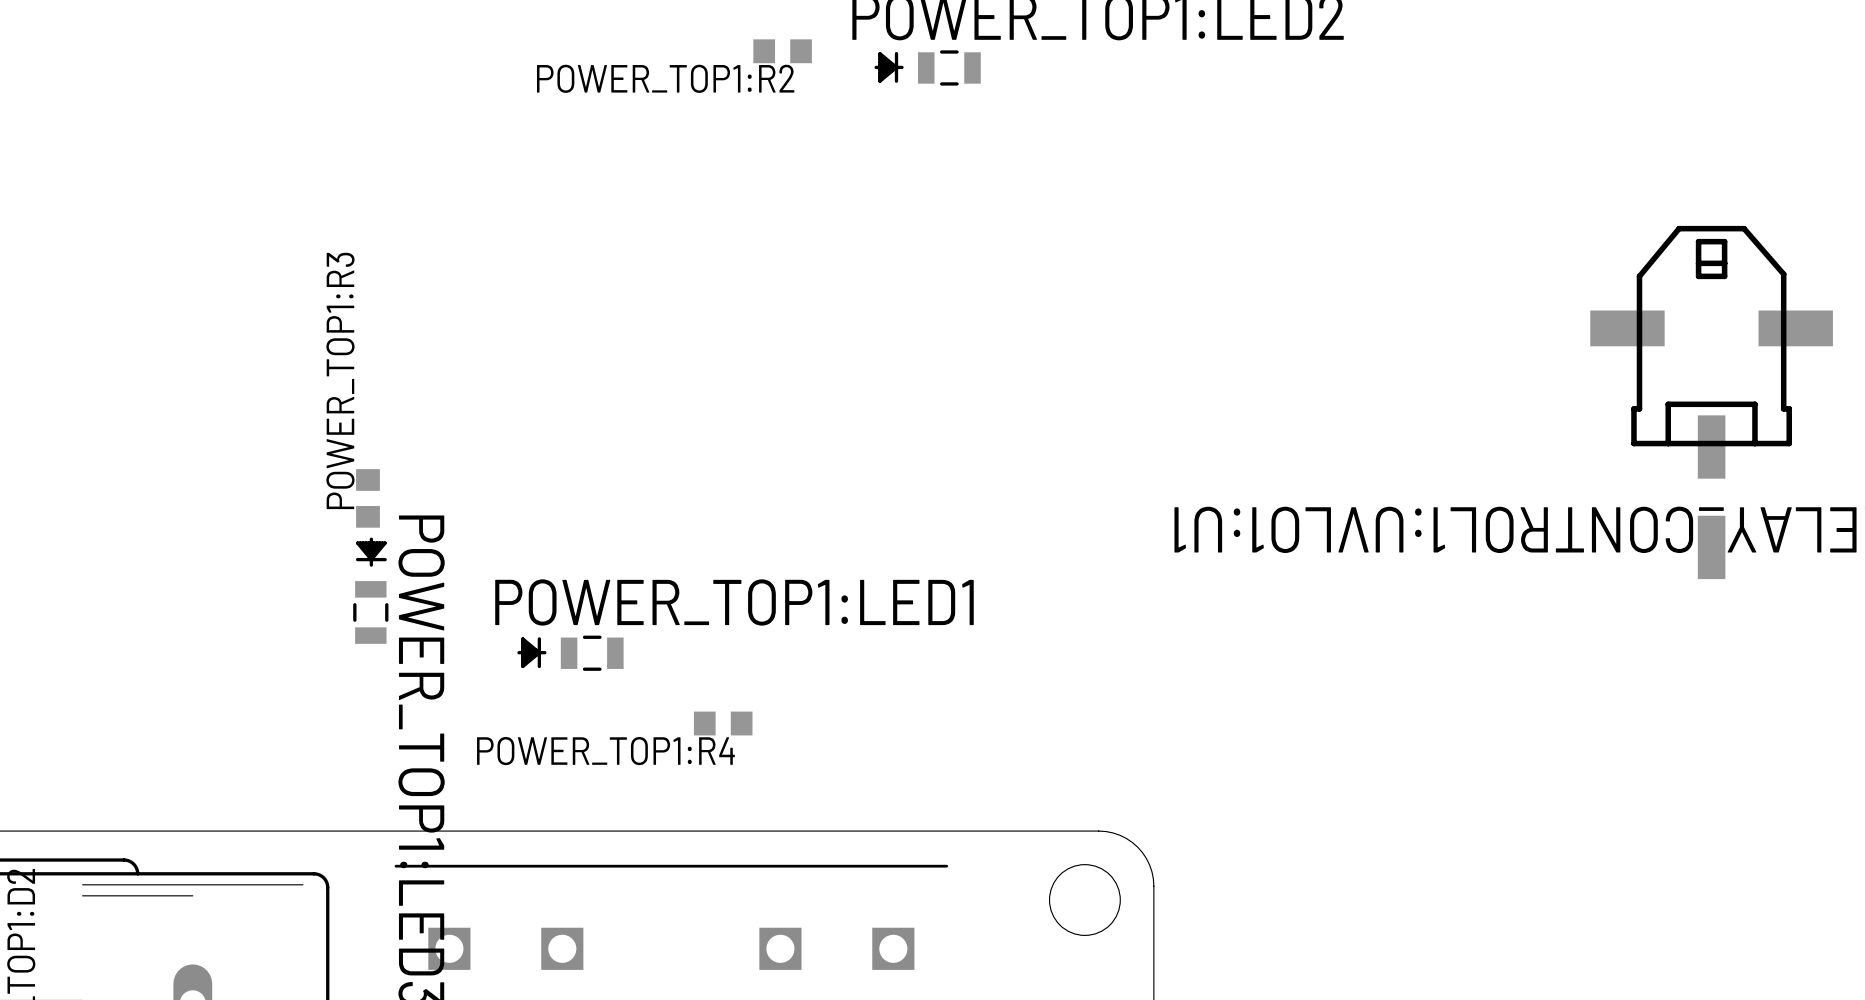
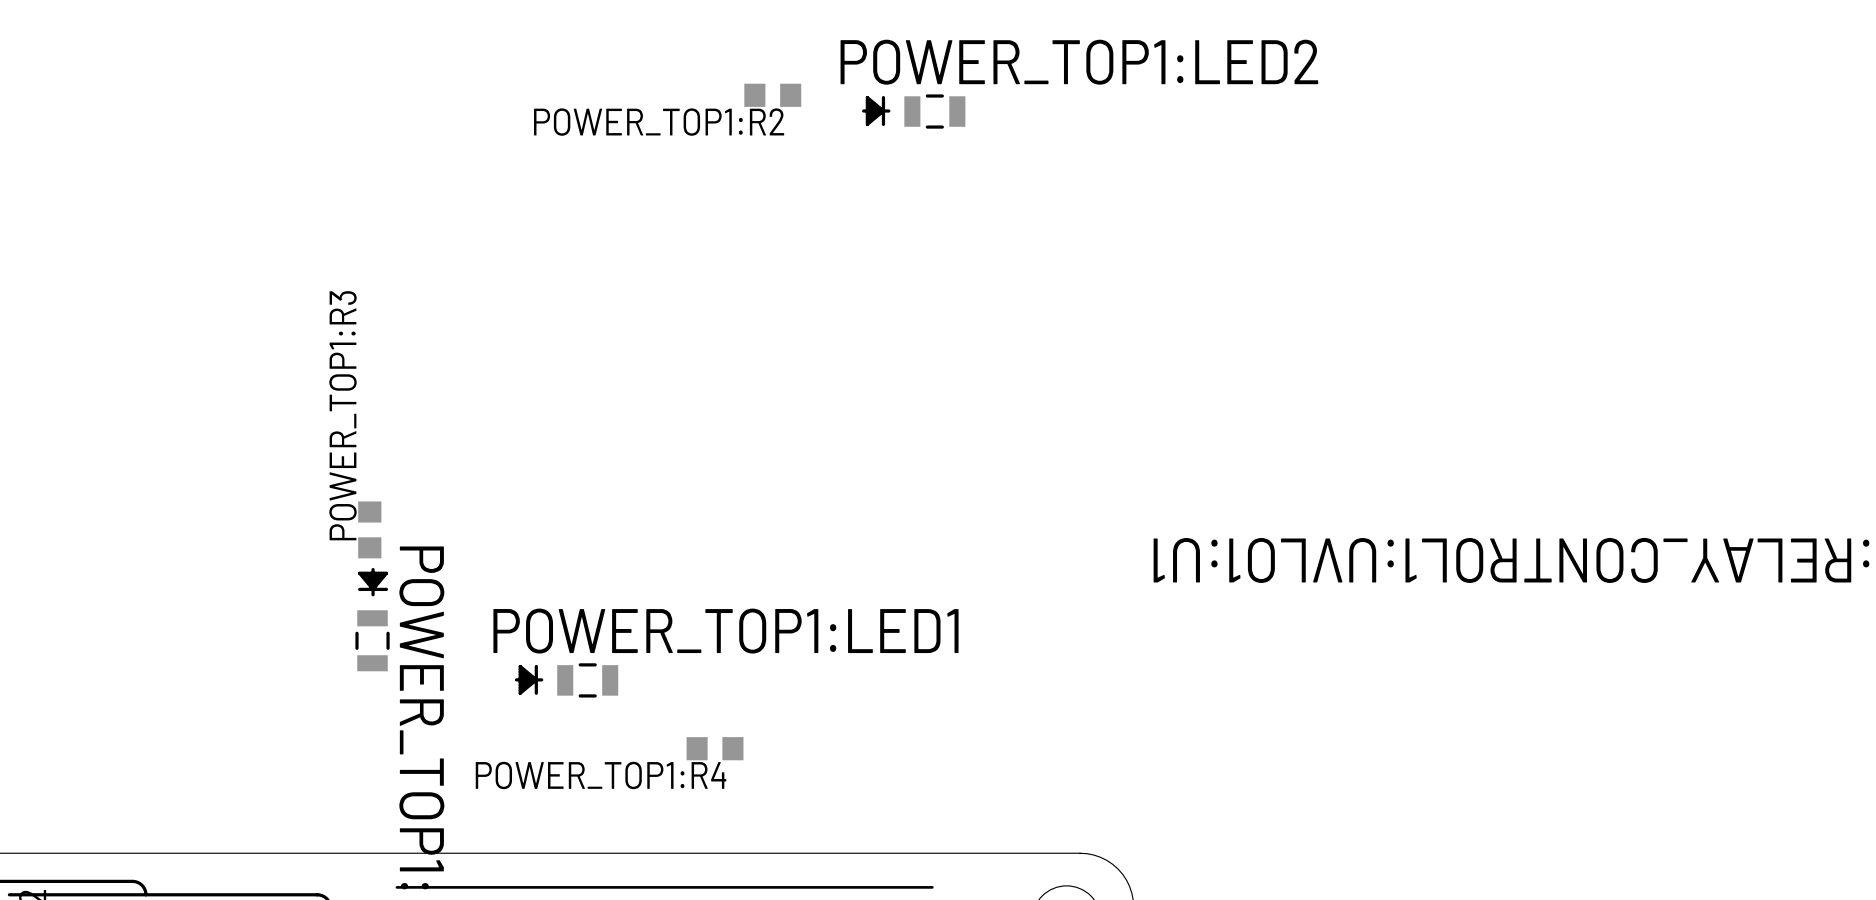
part: (1711, 402) -> none

